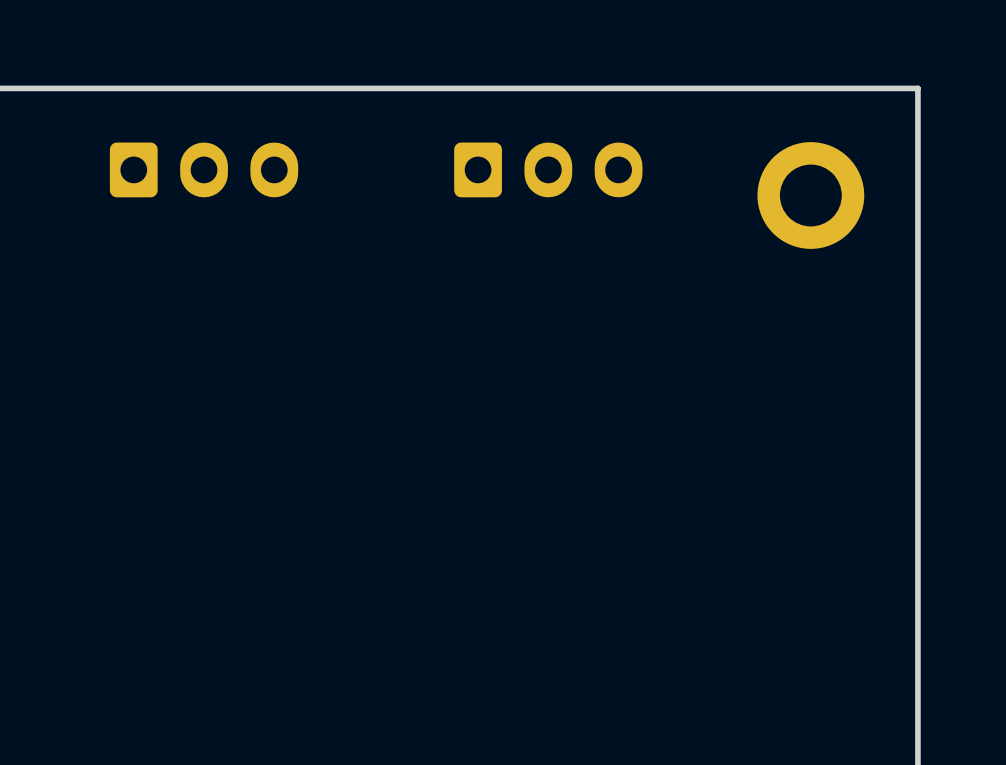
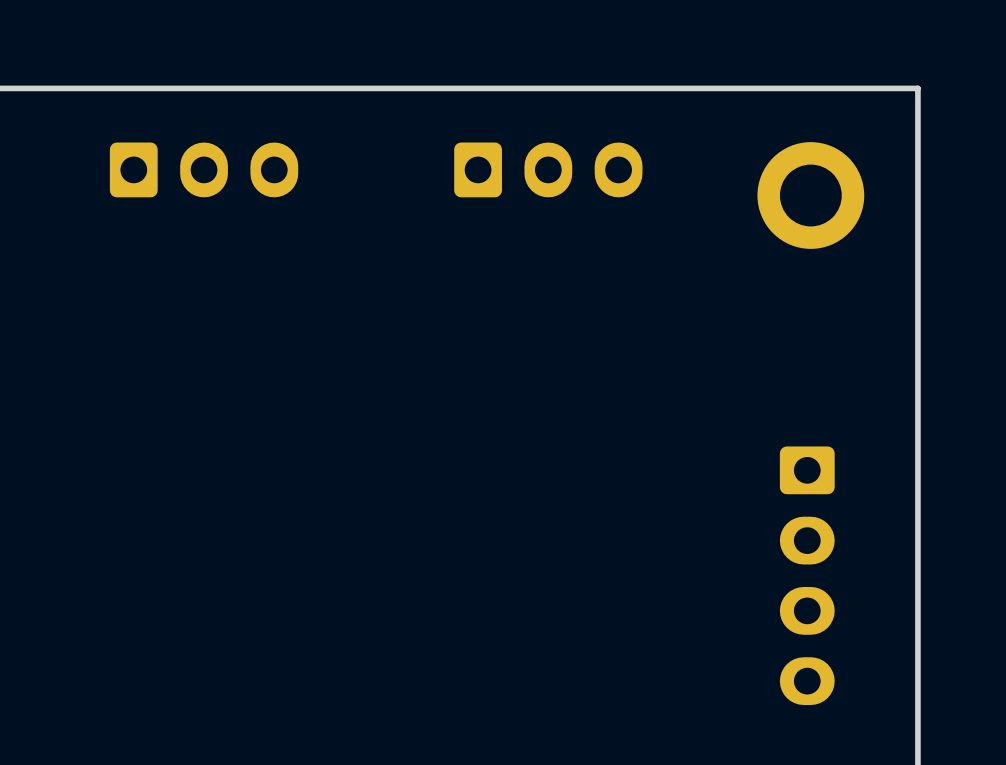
part: none -> (807, 575)

